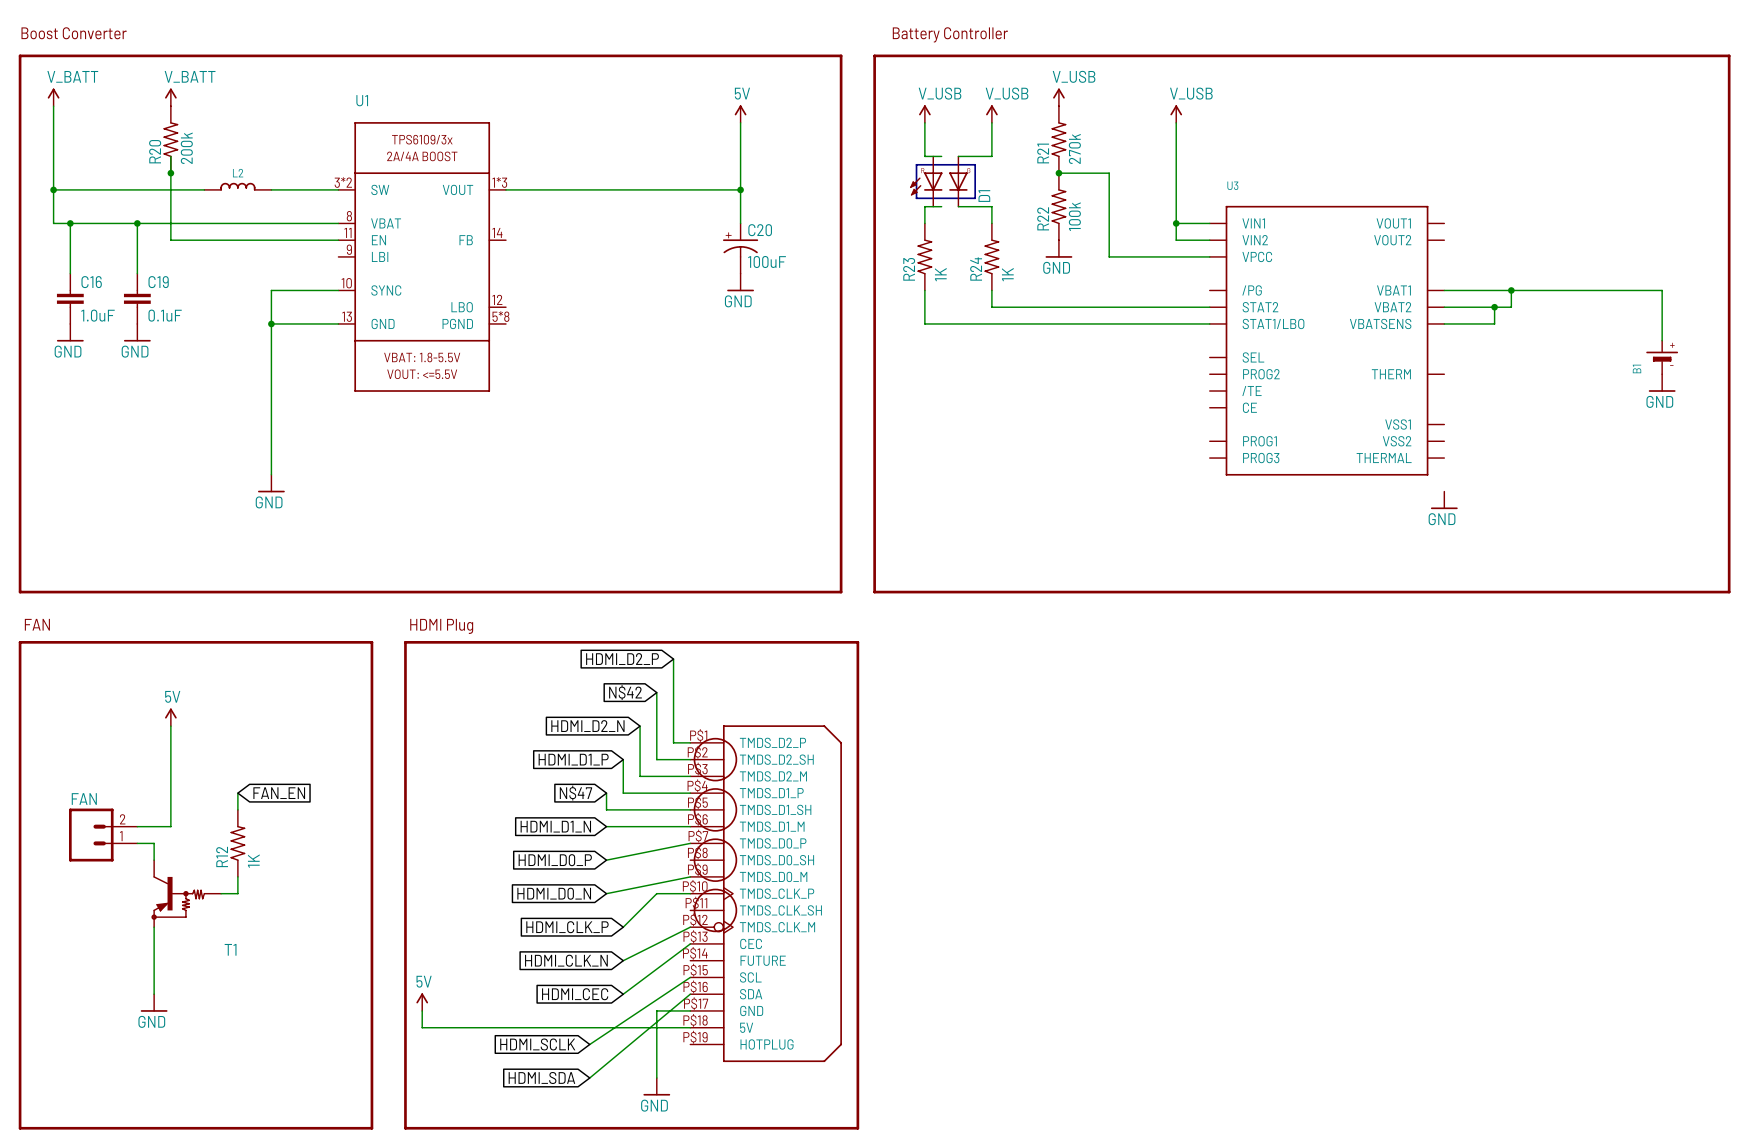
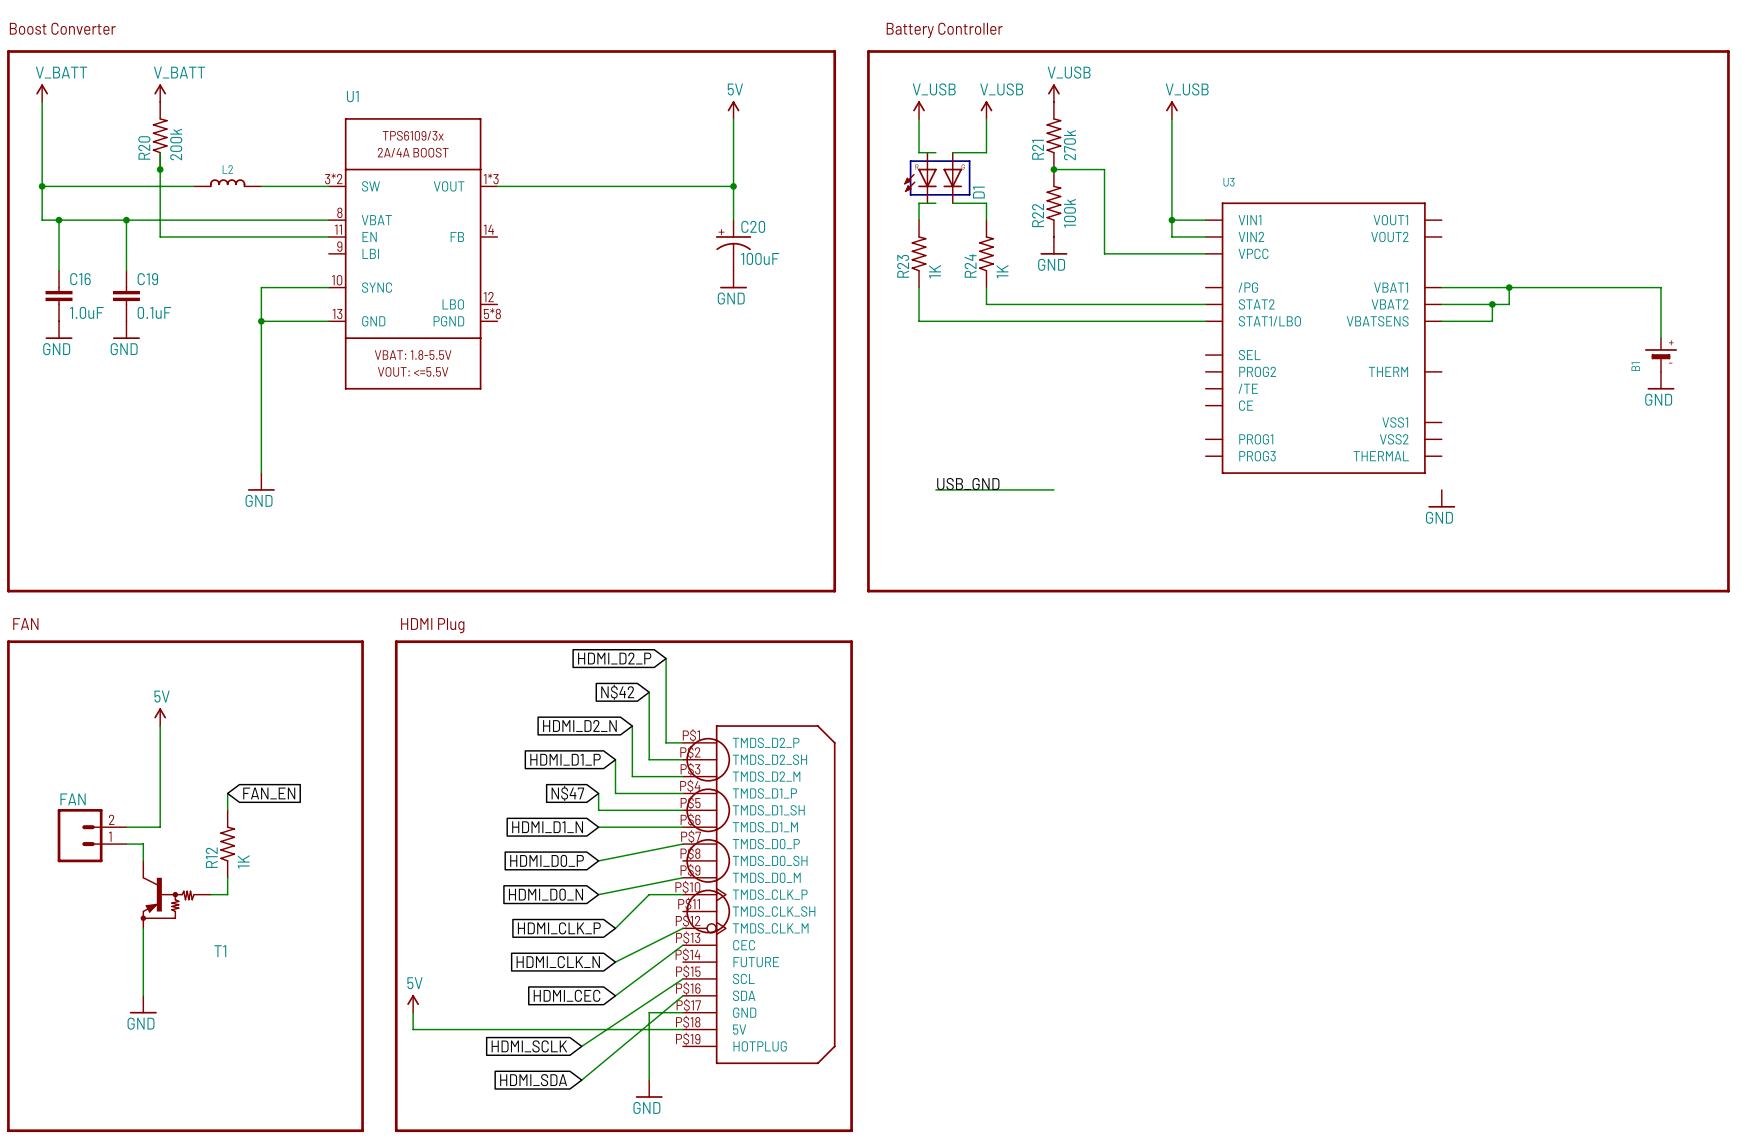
label: none -> USB_GND (968, 484)
wire: none -> (935, 489) (1053, 489)

